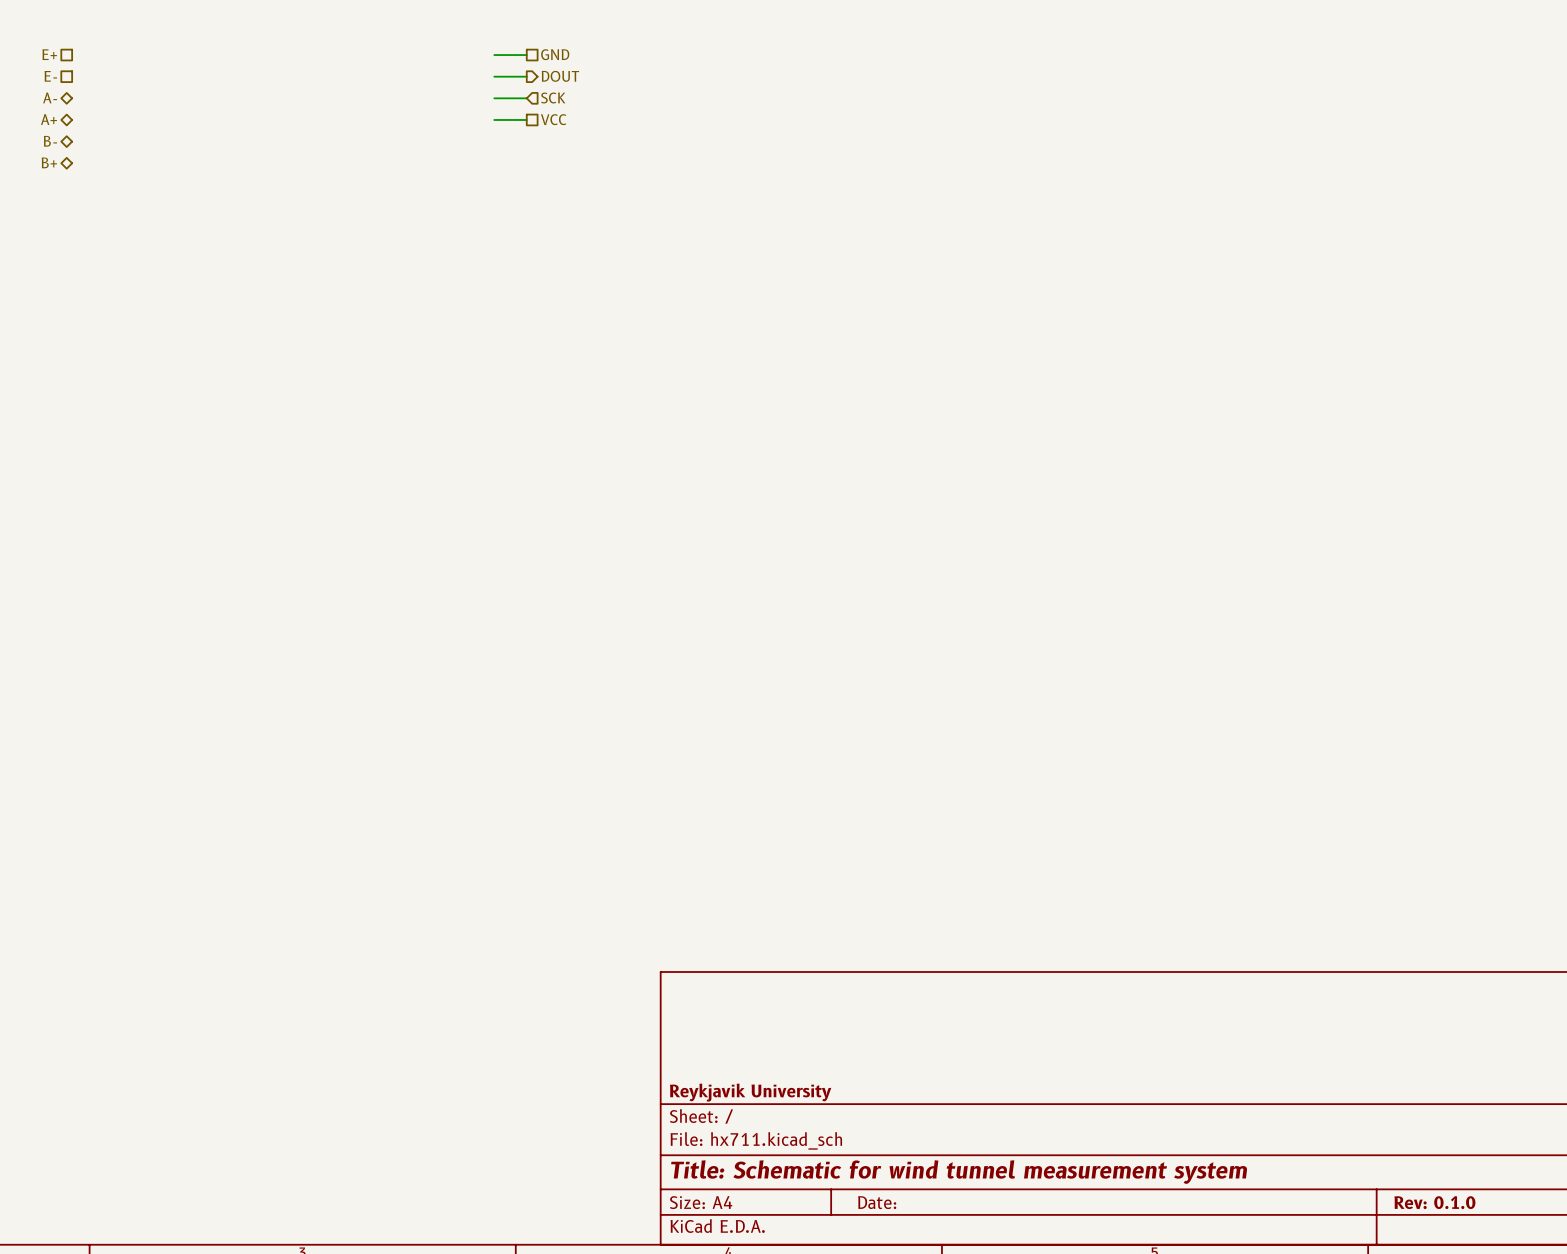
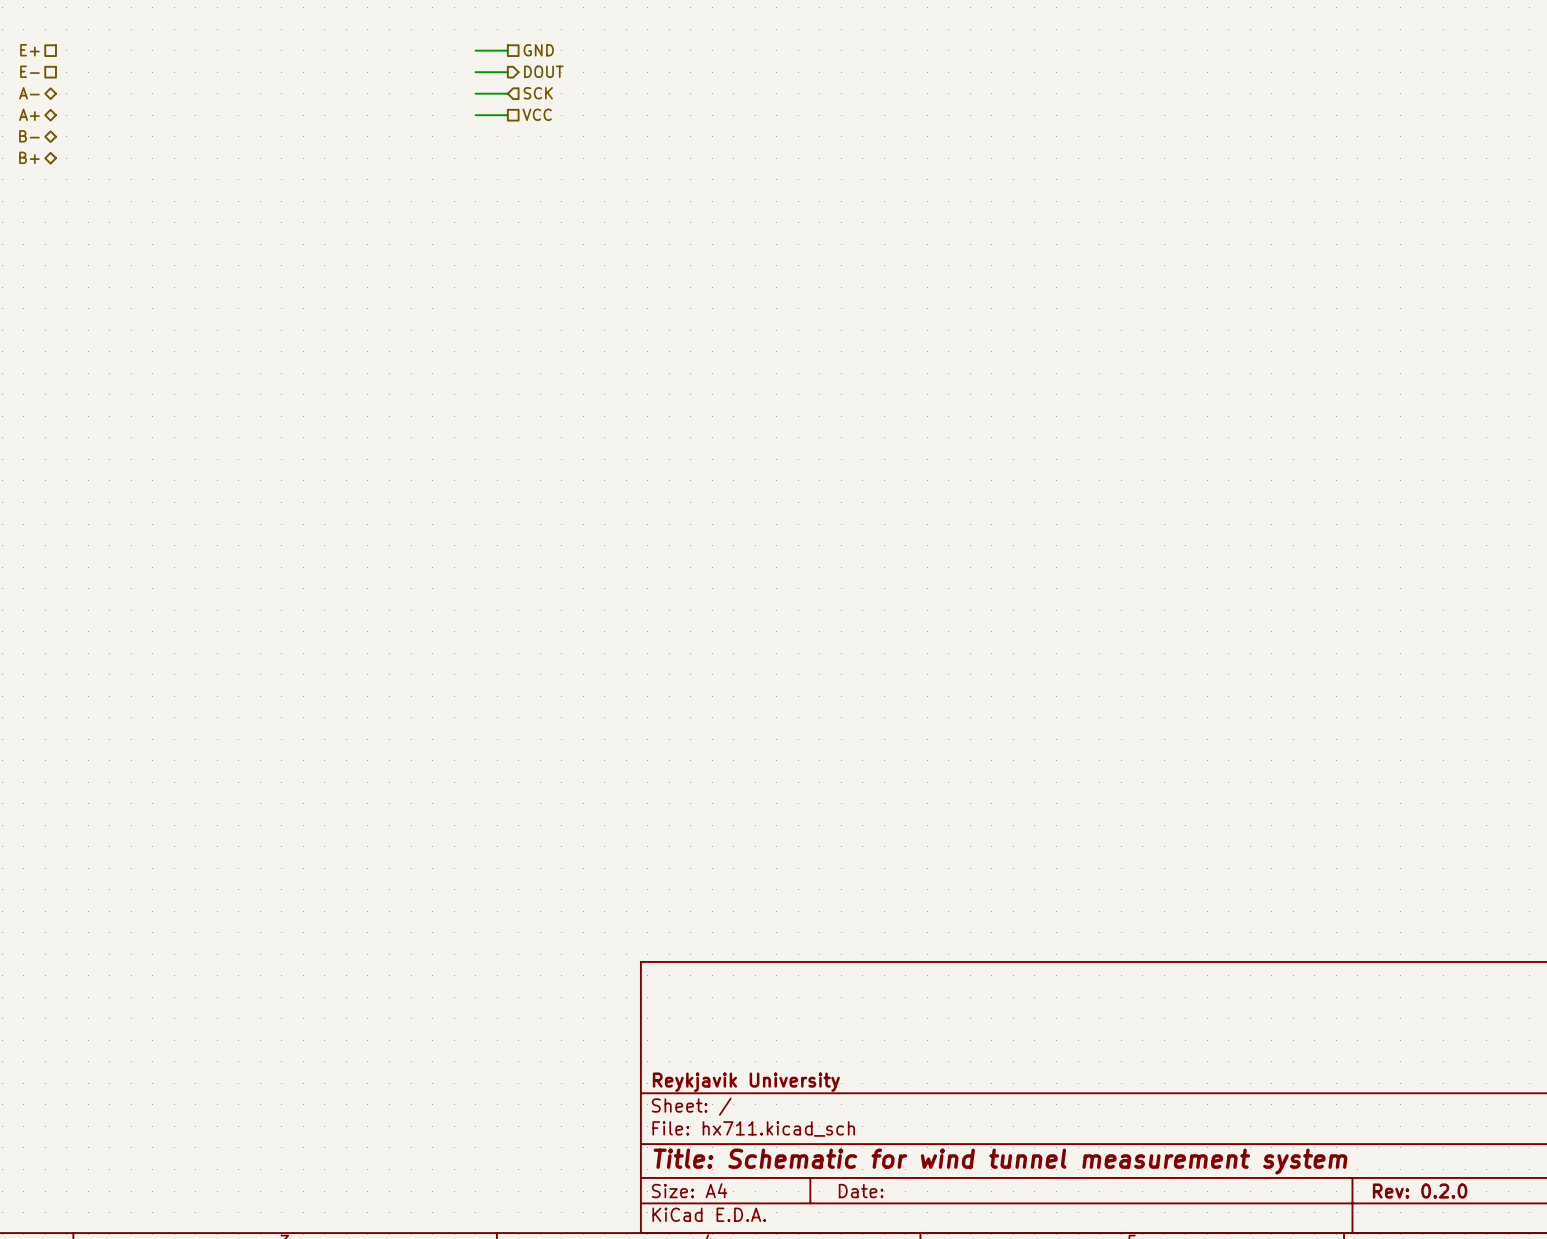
title block: Rev: 0.1.0 (1434, 1202) -> Rev: 0.2.0 (1420, 1191)

